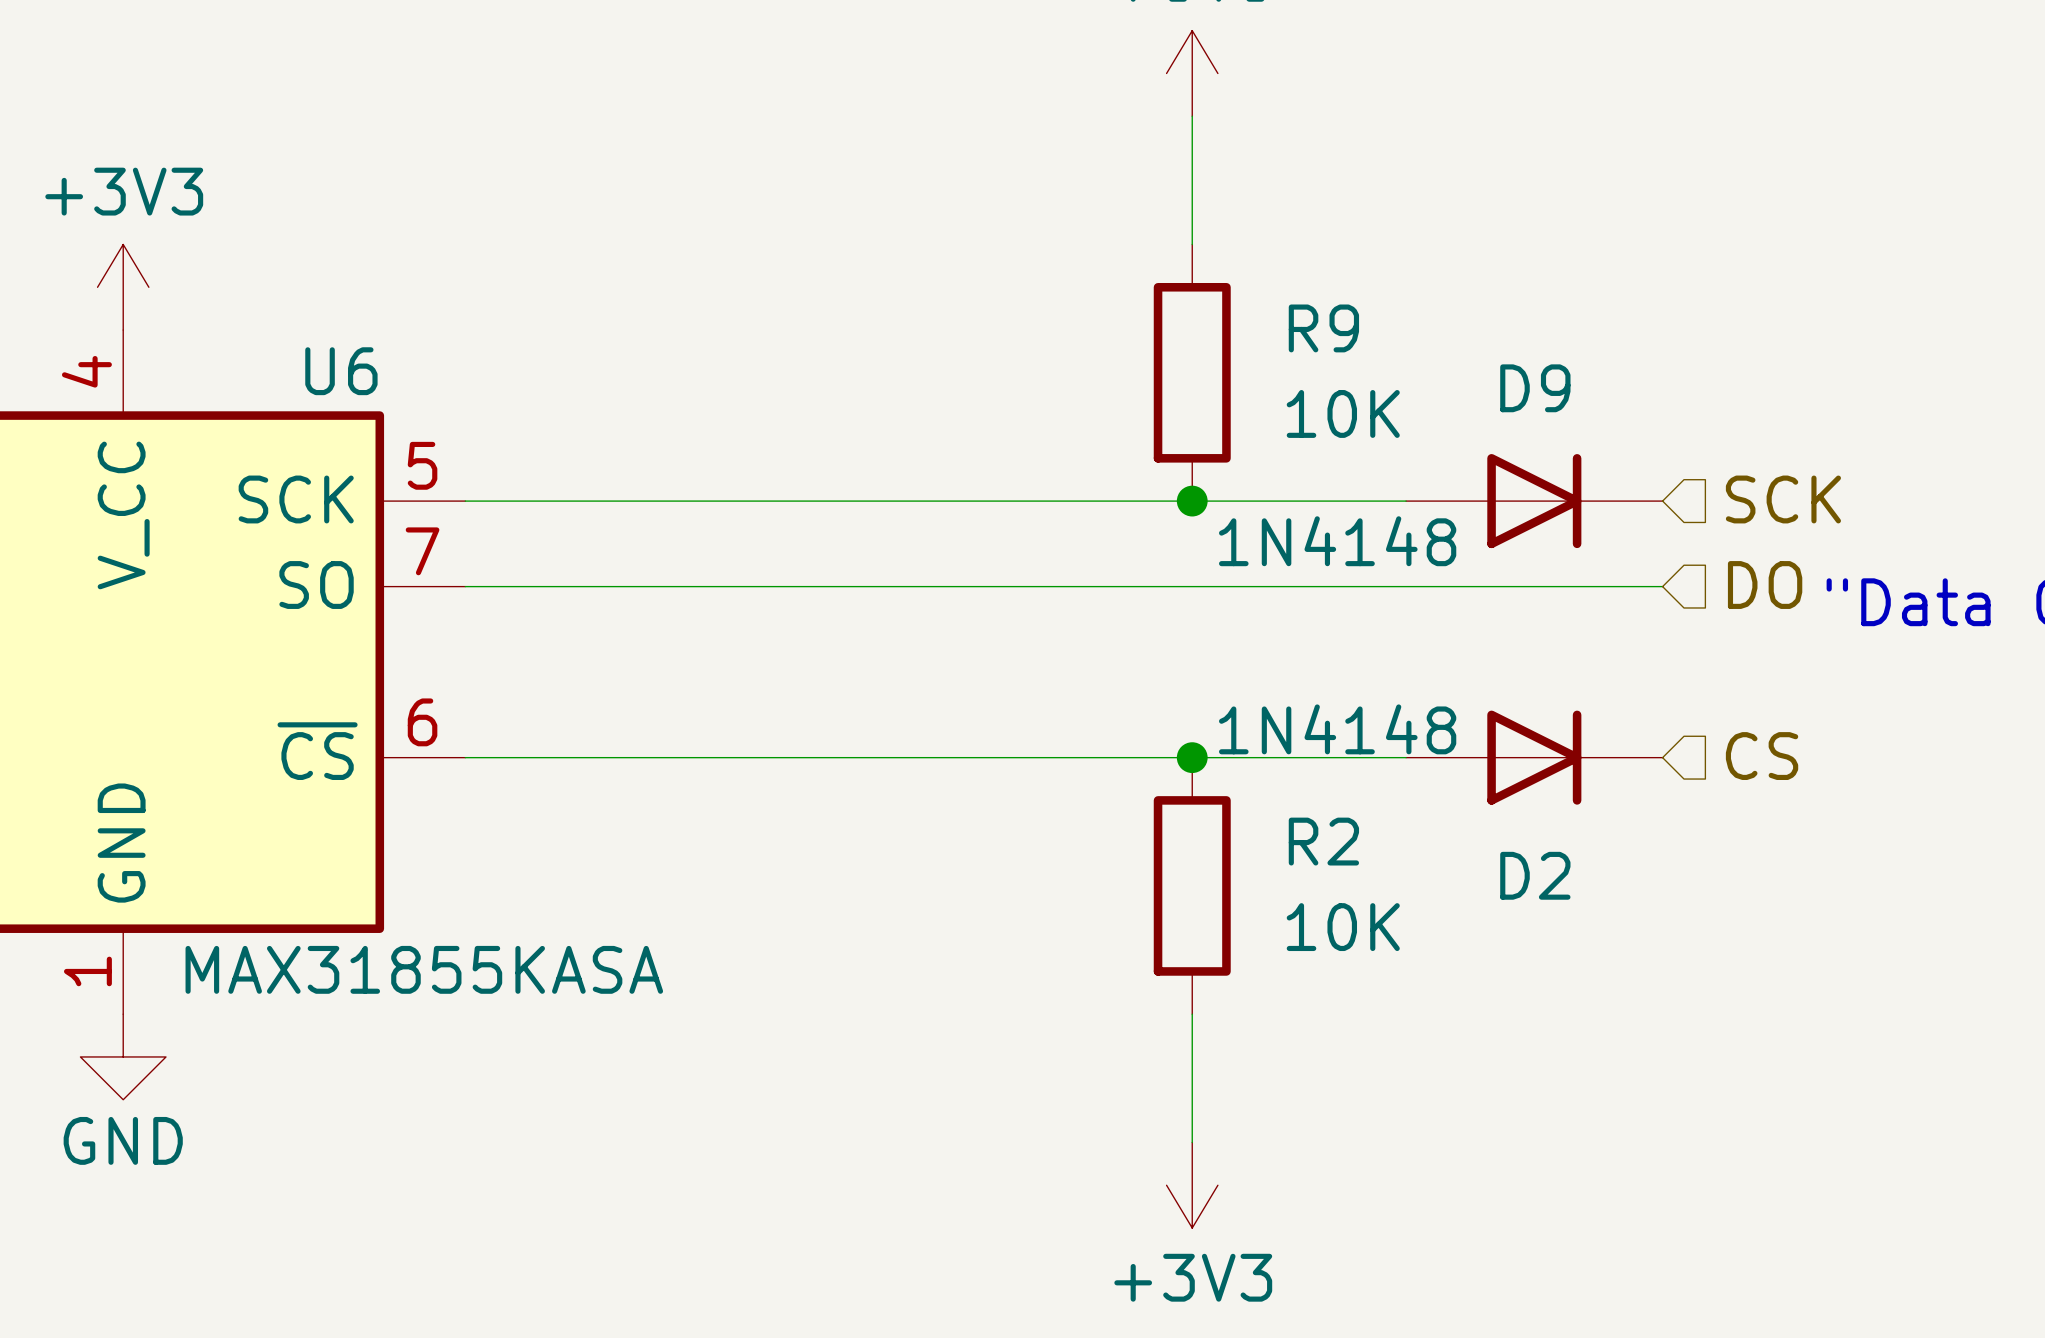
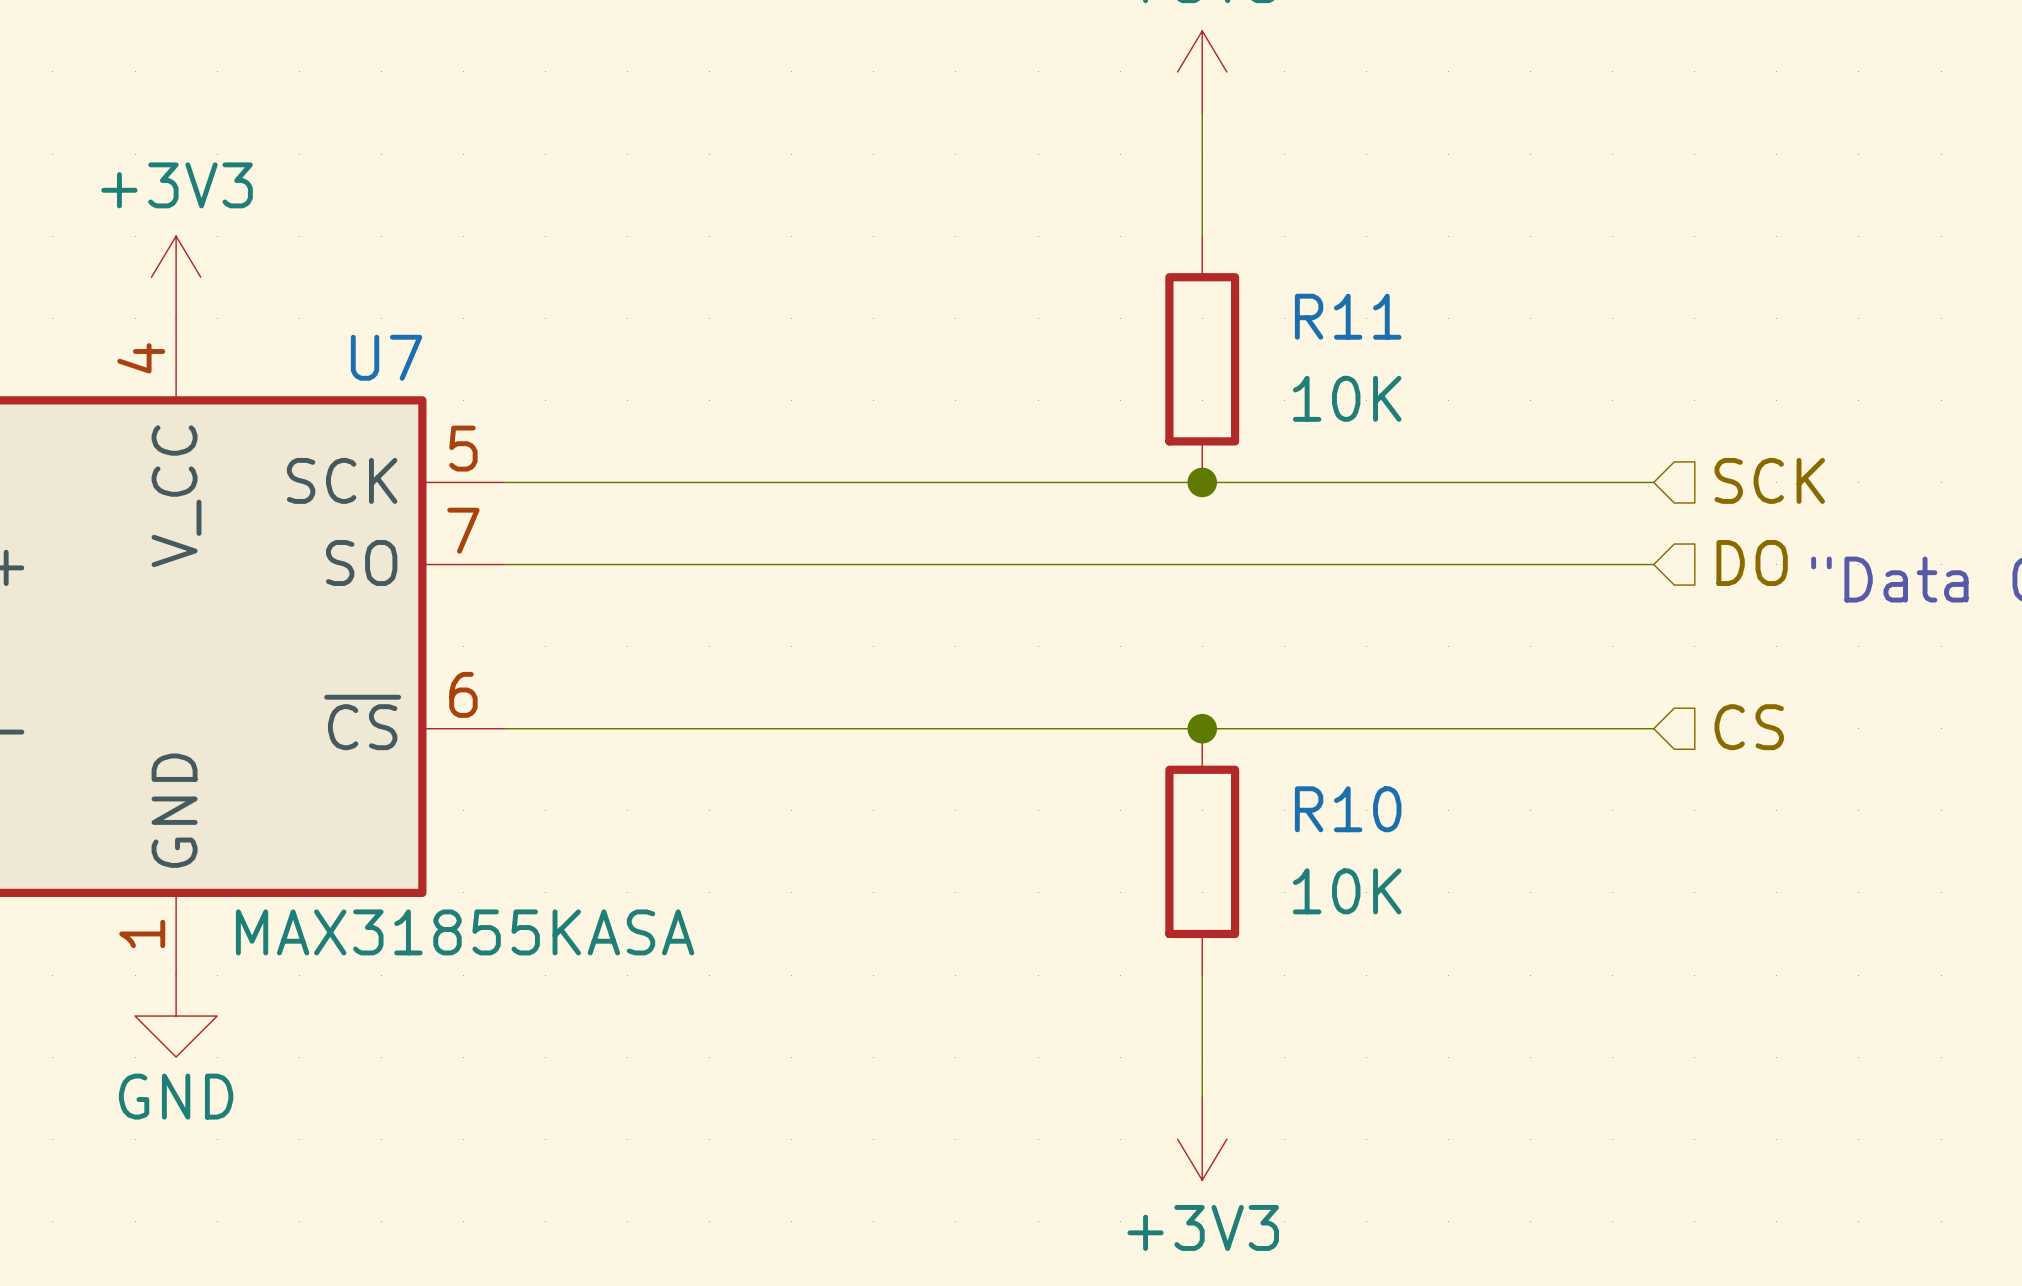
R9 name: R9 (1323, 328) -> R11 (1348, 316)
U6 name: U6 (341, 371) -> U7 (386, 357)
D9: 1N4148 (1534, 501) -> none
D2: 1N4148 (1534, 757) -> none
R2 name: R2 (1323, 841) -> R10 (1348, 809)

